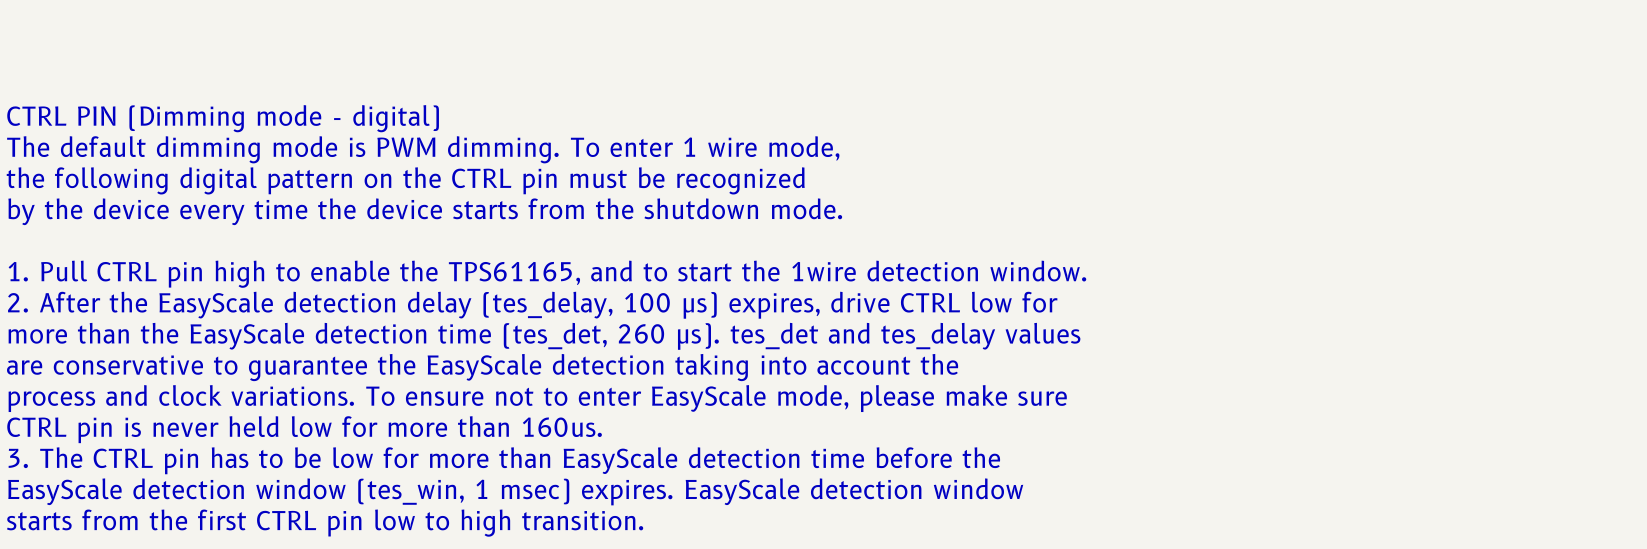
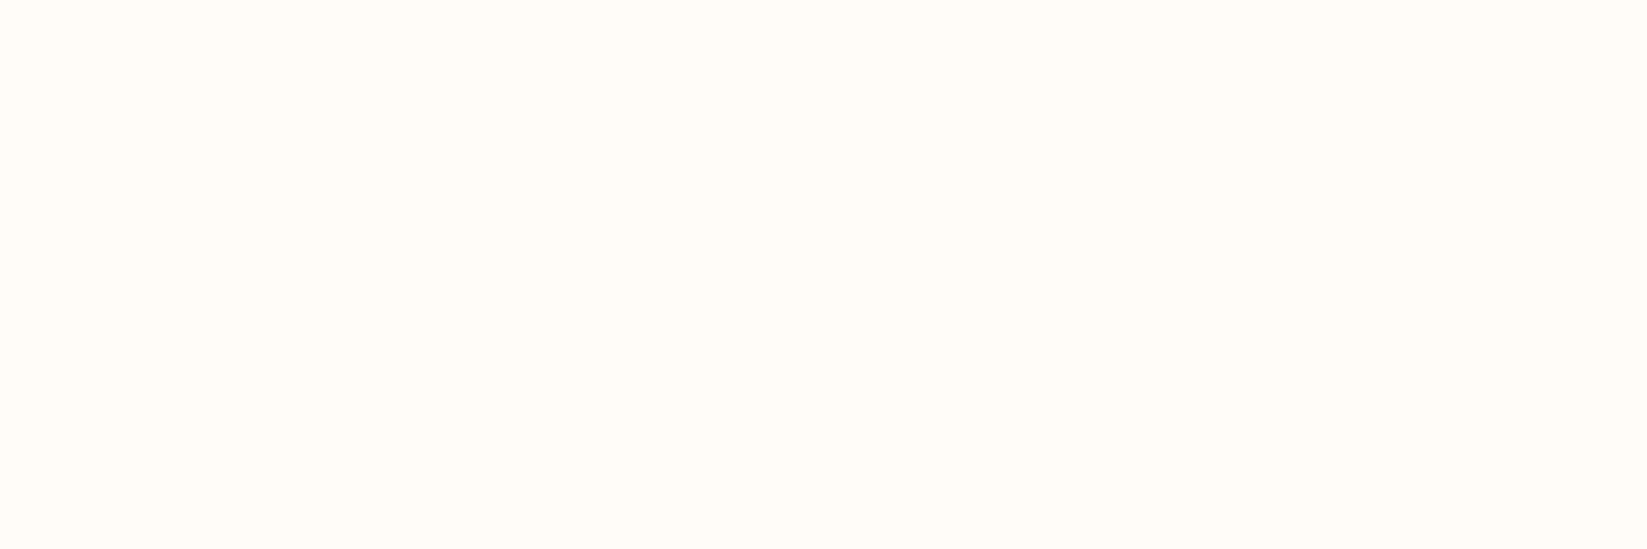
text: CTRL PIN (Dimming mode - digital) (223, 118) -> none
text: The default dimming mode is PWM dimming. To enter 1 wire mode, (423, 149) -> none
text: the following digital pattern on the CTRL pin must be recognized (405, 180) -> none
text: by the device every time the device starts from the shutdown mode. (425, 211) -> none
text: 1. Pull CTRL pin high to enable the TPS61165, and to start the 1wire detection window. (547, 274) -> none
text: 2. After the EasyScale detection delay (tes_delay, 100 μs) expires, drive CTRL low for (532, 305) -> none
text: more than the EasyScale detection time (tes_det, 260 μs). tes_det and tes_delay values (544, 336) -> none
text: are conservative to guarantee the EasyScale detection taking into account the (482, 367) -> none
text: process and clock variations. To ensure not to enter EasyScale mode, please make sure (537, 398) -> none
text: CTRL pin is never held low for more than 160us. (304, 429) -> none
text: 3. The CTRL pin has to be low for more than EasyScale detection time before the (504, 460) -> none
text: EasyScale detection window (tes_win, 1 msec) expires. EasyScale detection window (515, 491) -> none
text: starts from the first CTRL pin low to high transition. (325, 523) -> none

